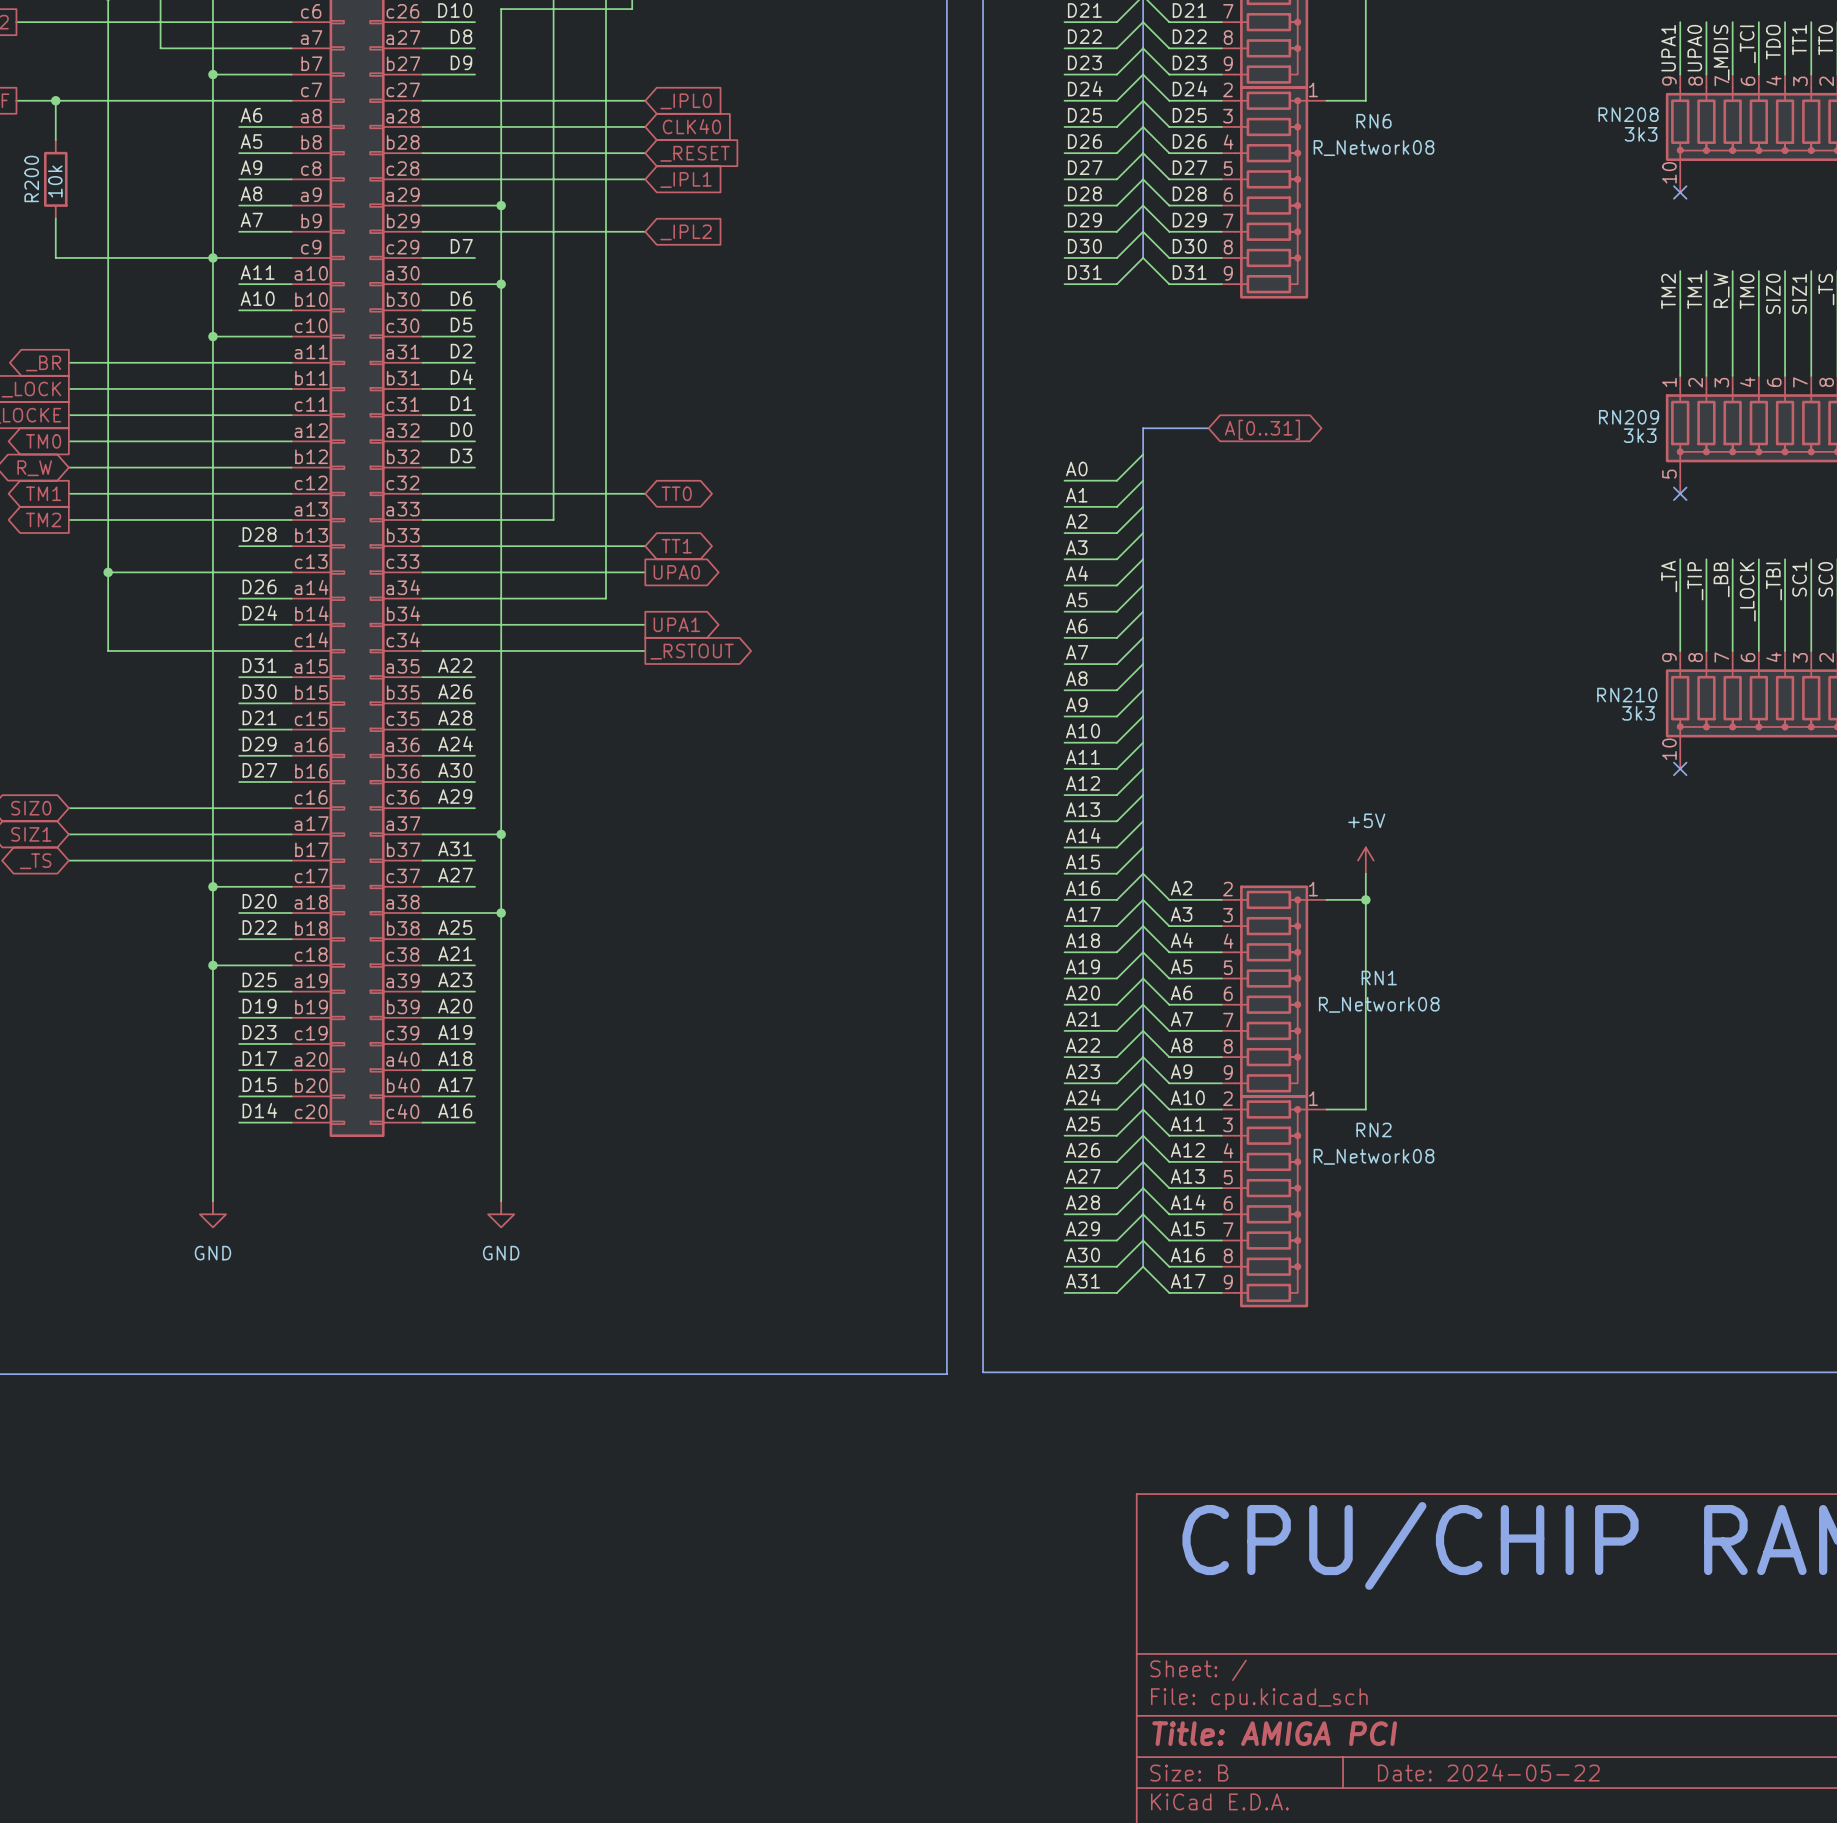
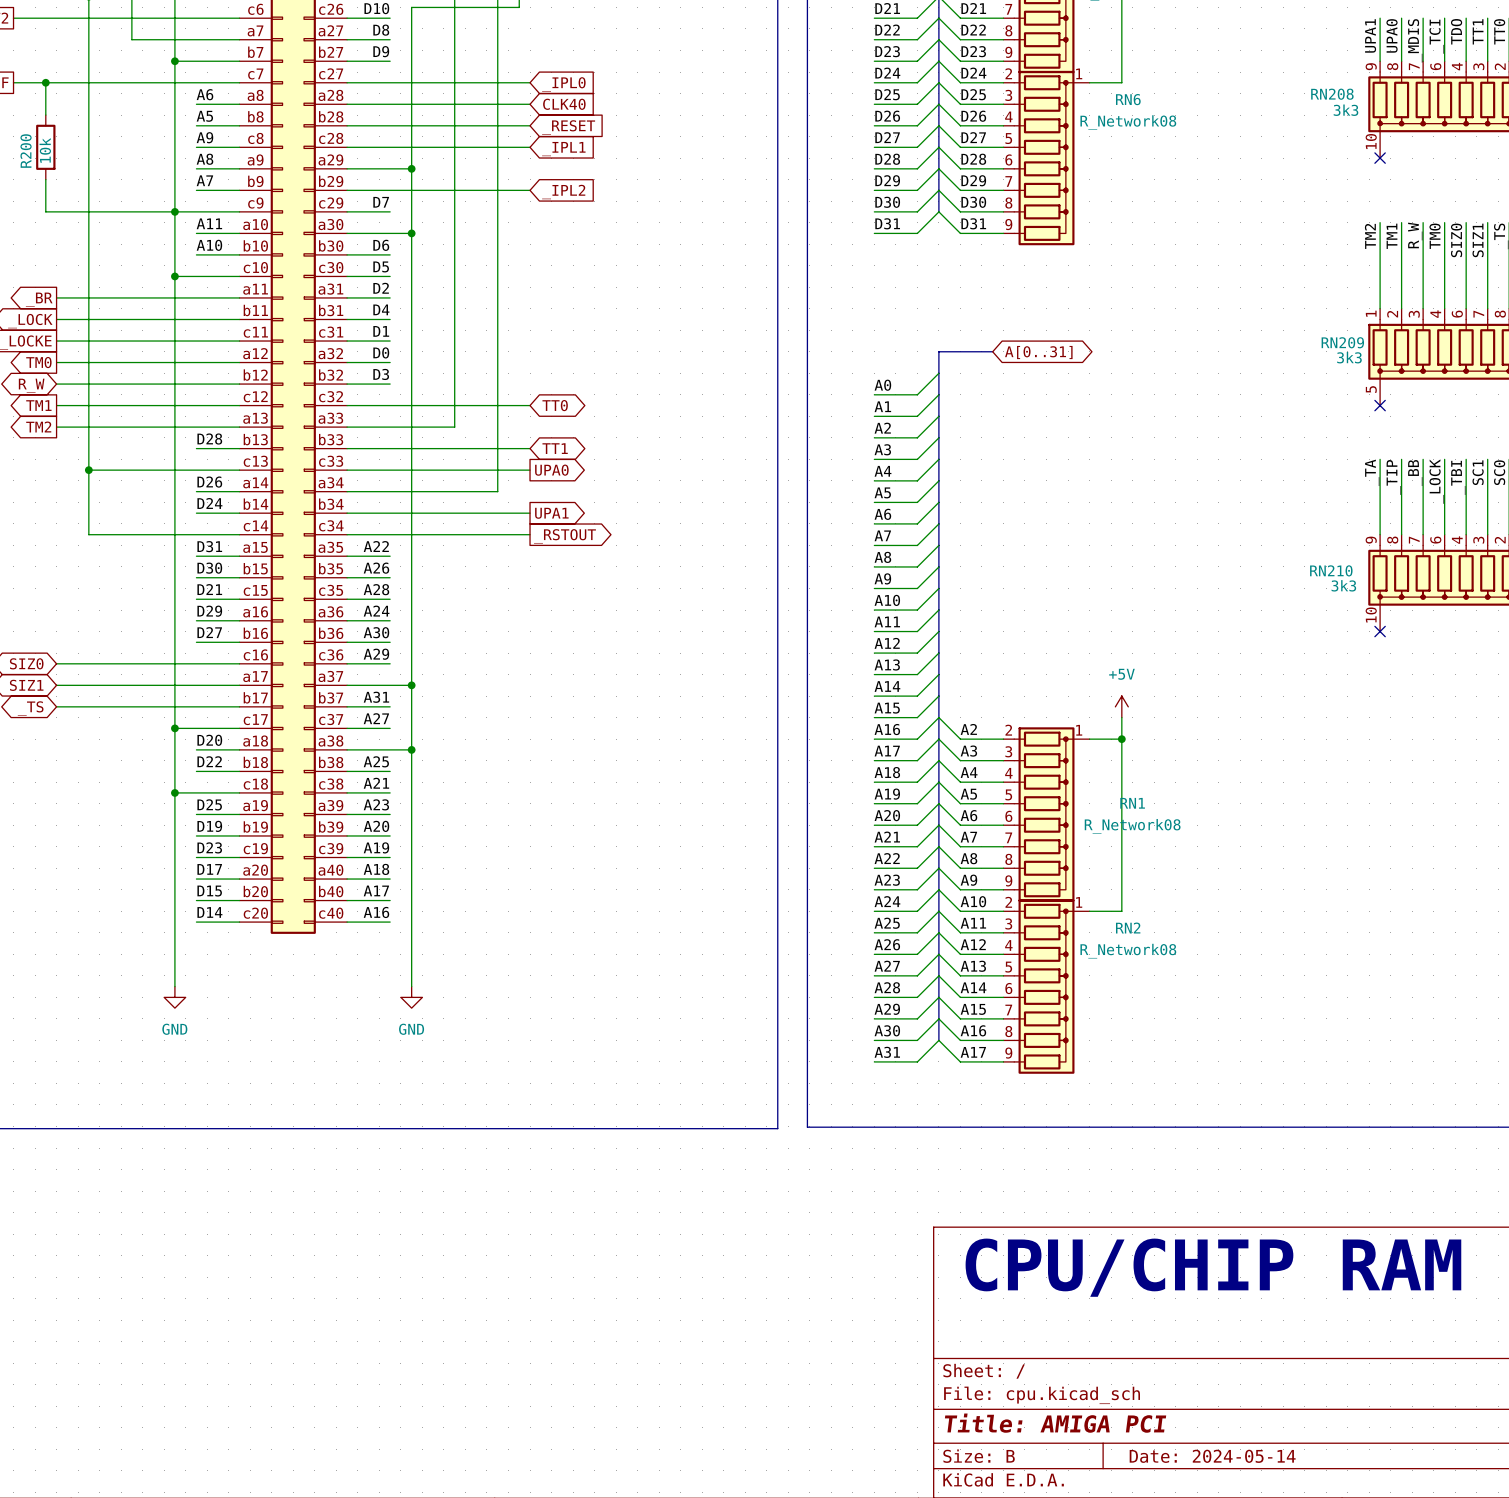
title block: Date: 2024-05-22 (1488, 1772) -> Date: 2024-05-14 (1212, 1456)

